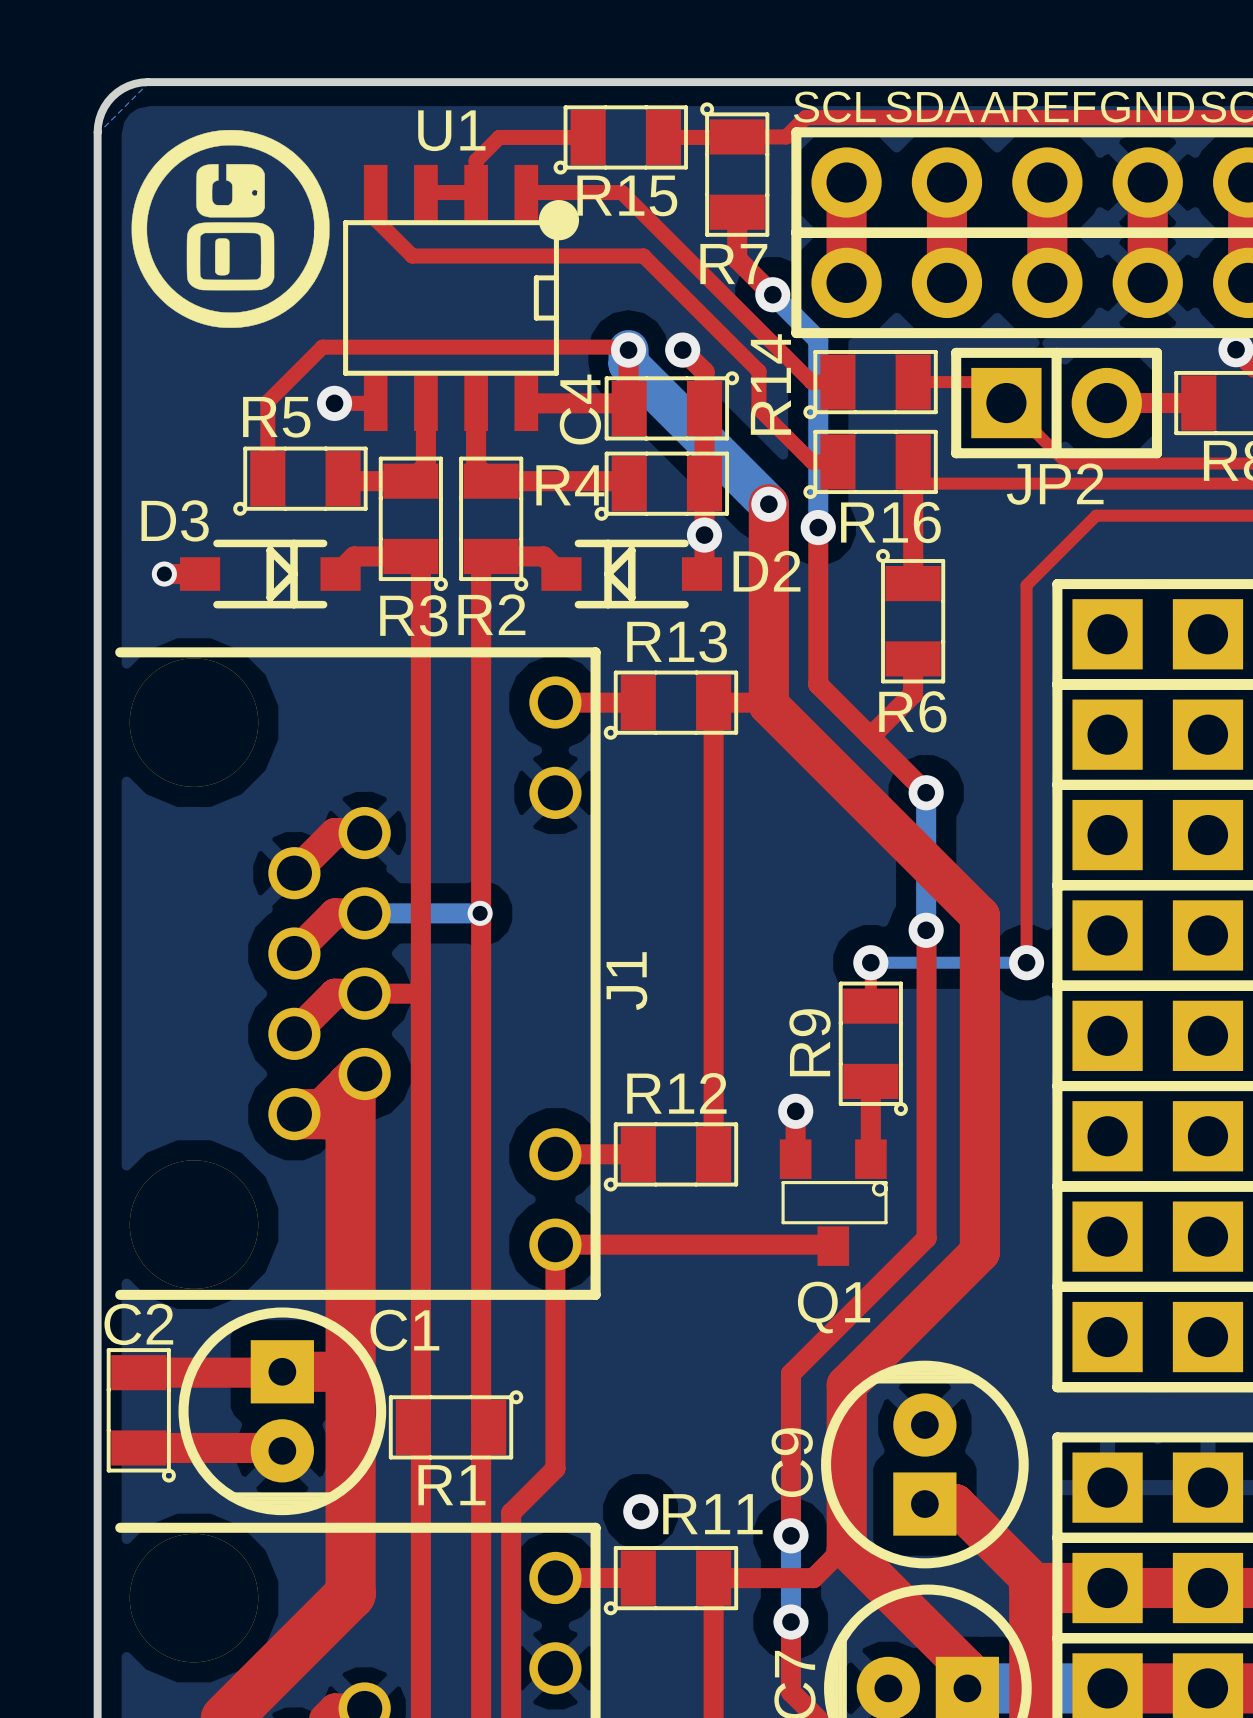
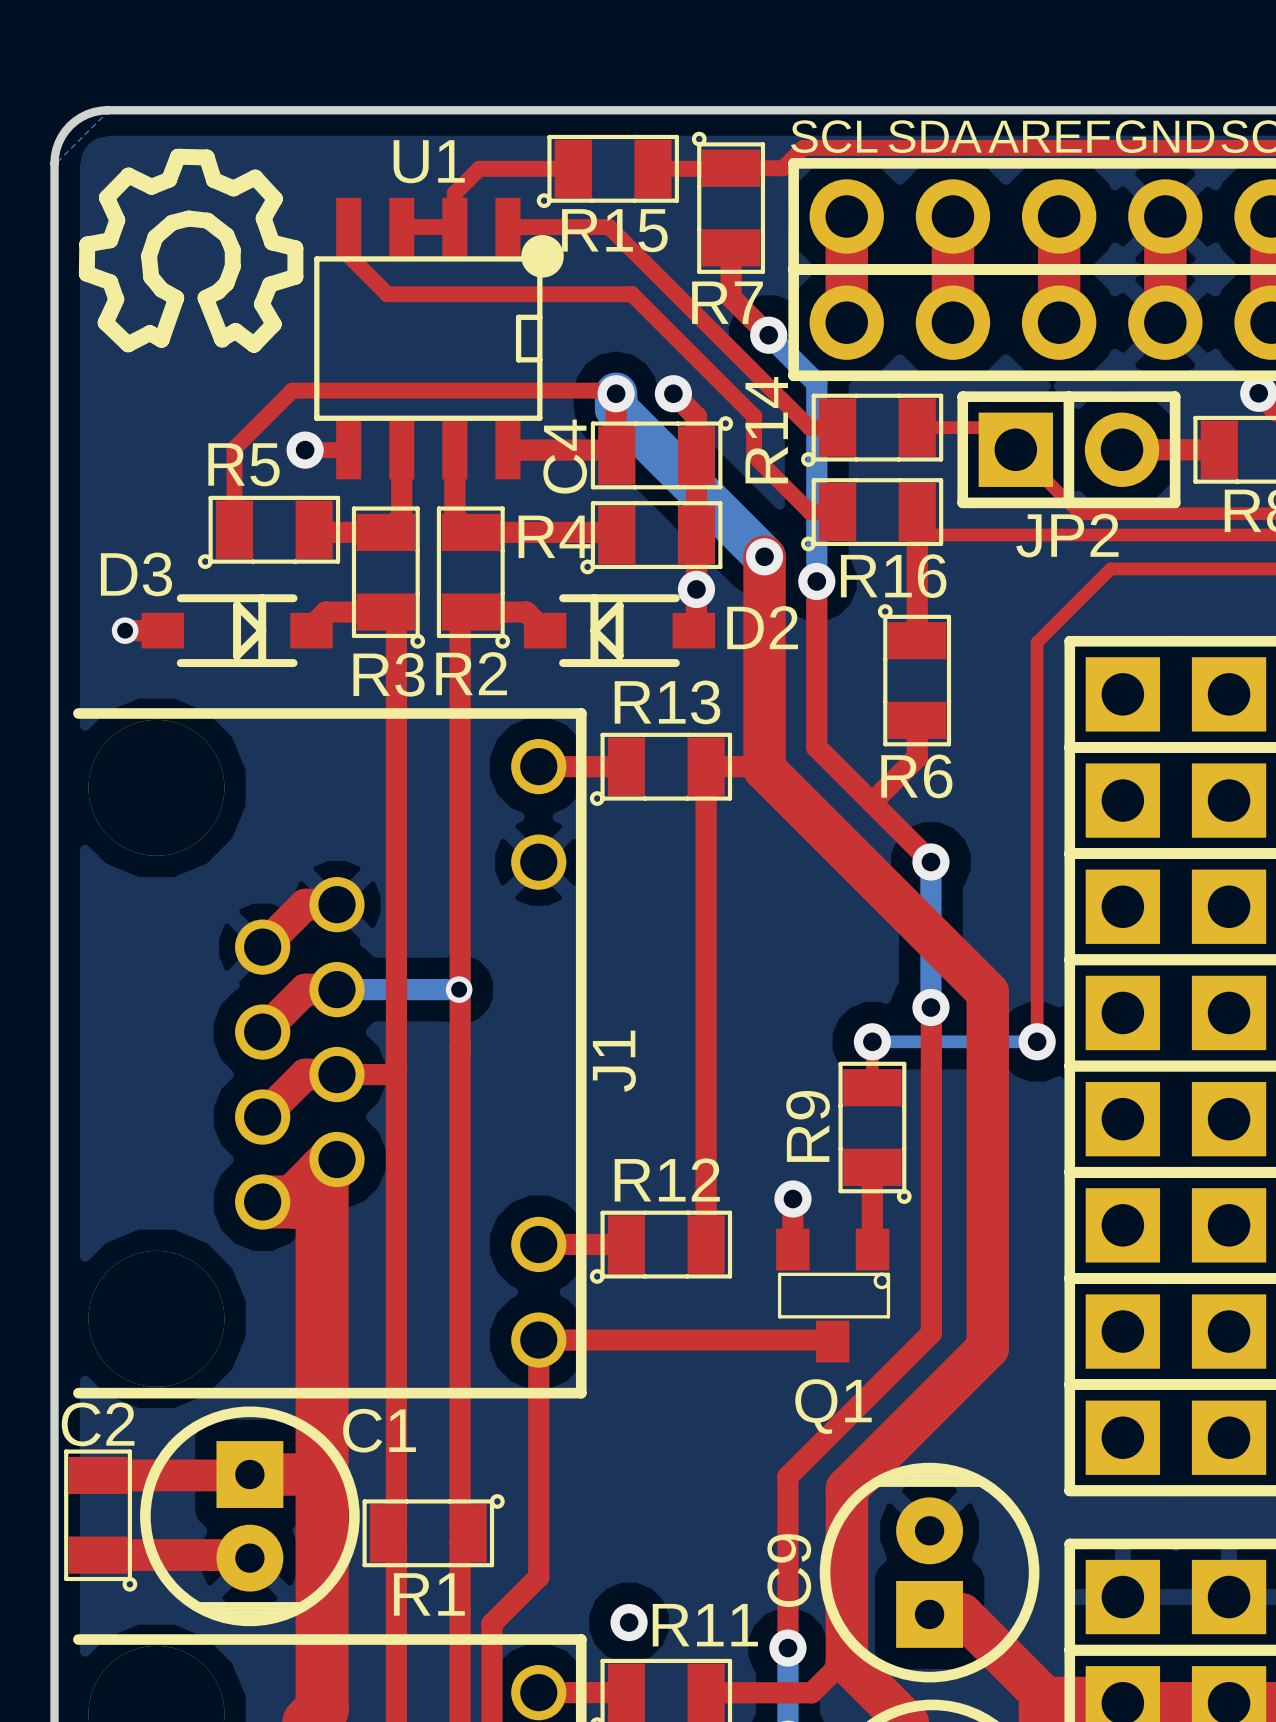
drawing shape: [131, 129, 330, 328] -> [78, 148, 304, 353]

